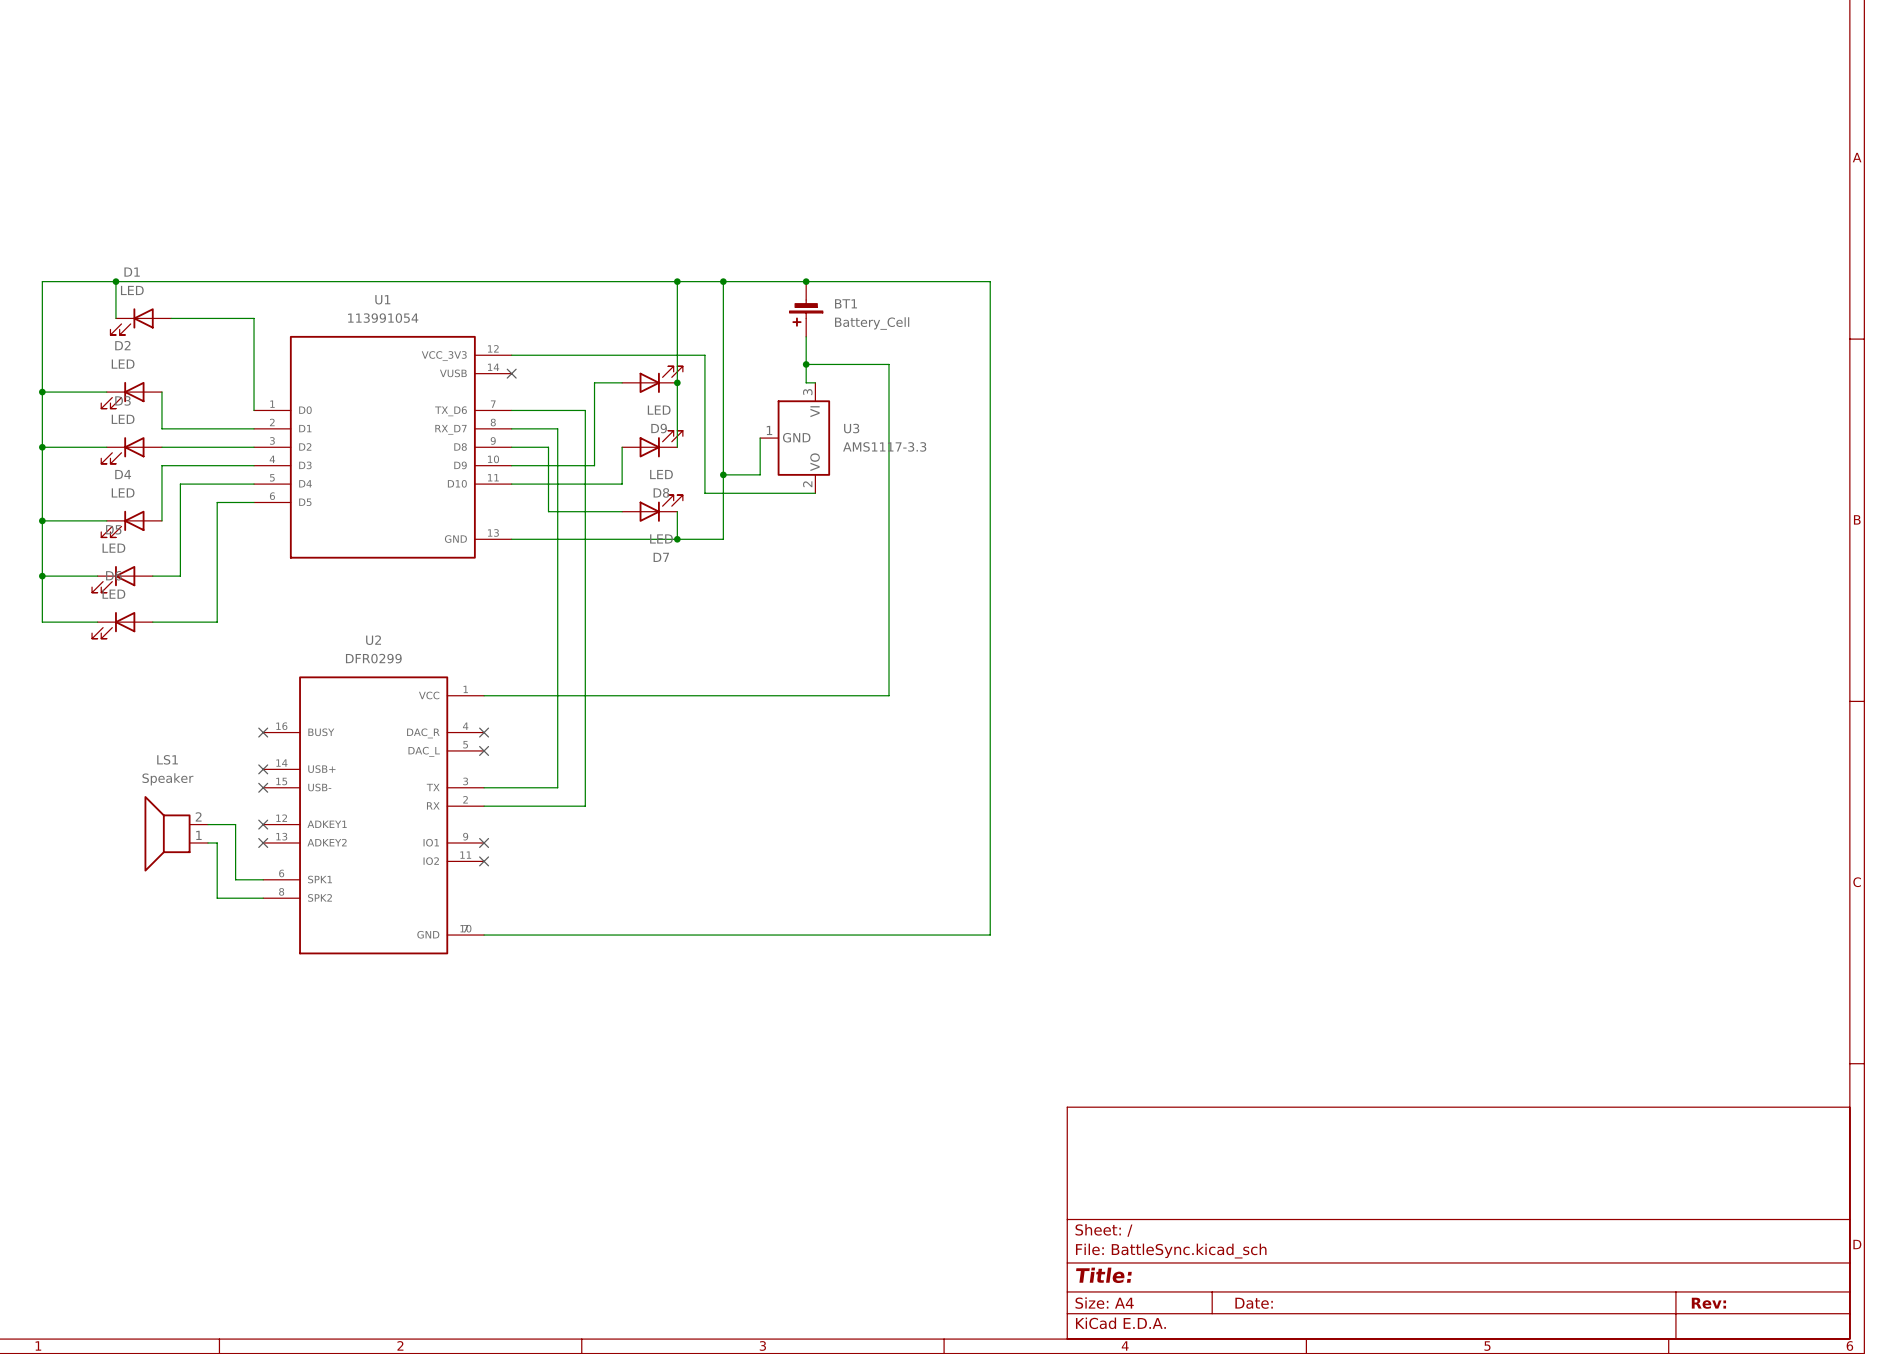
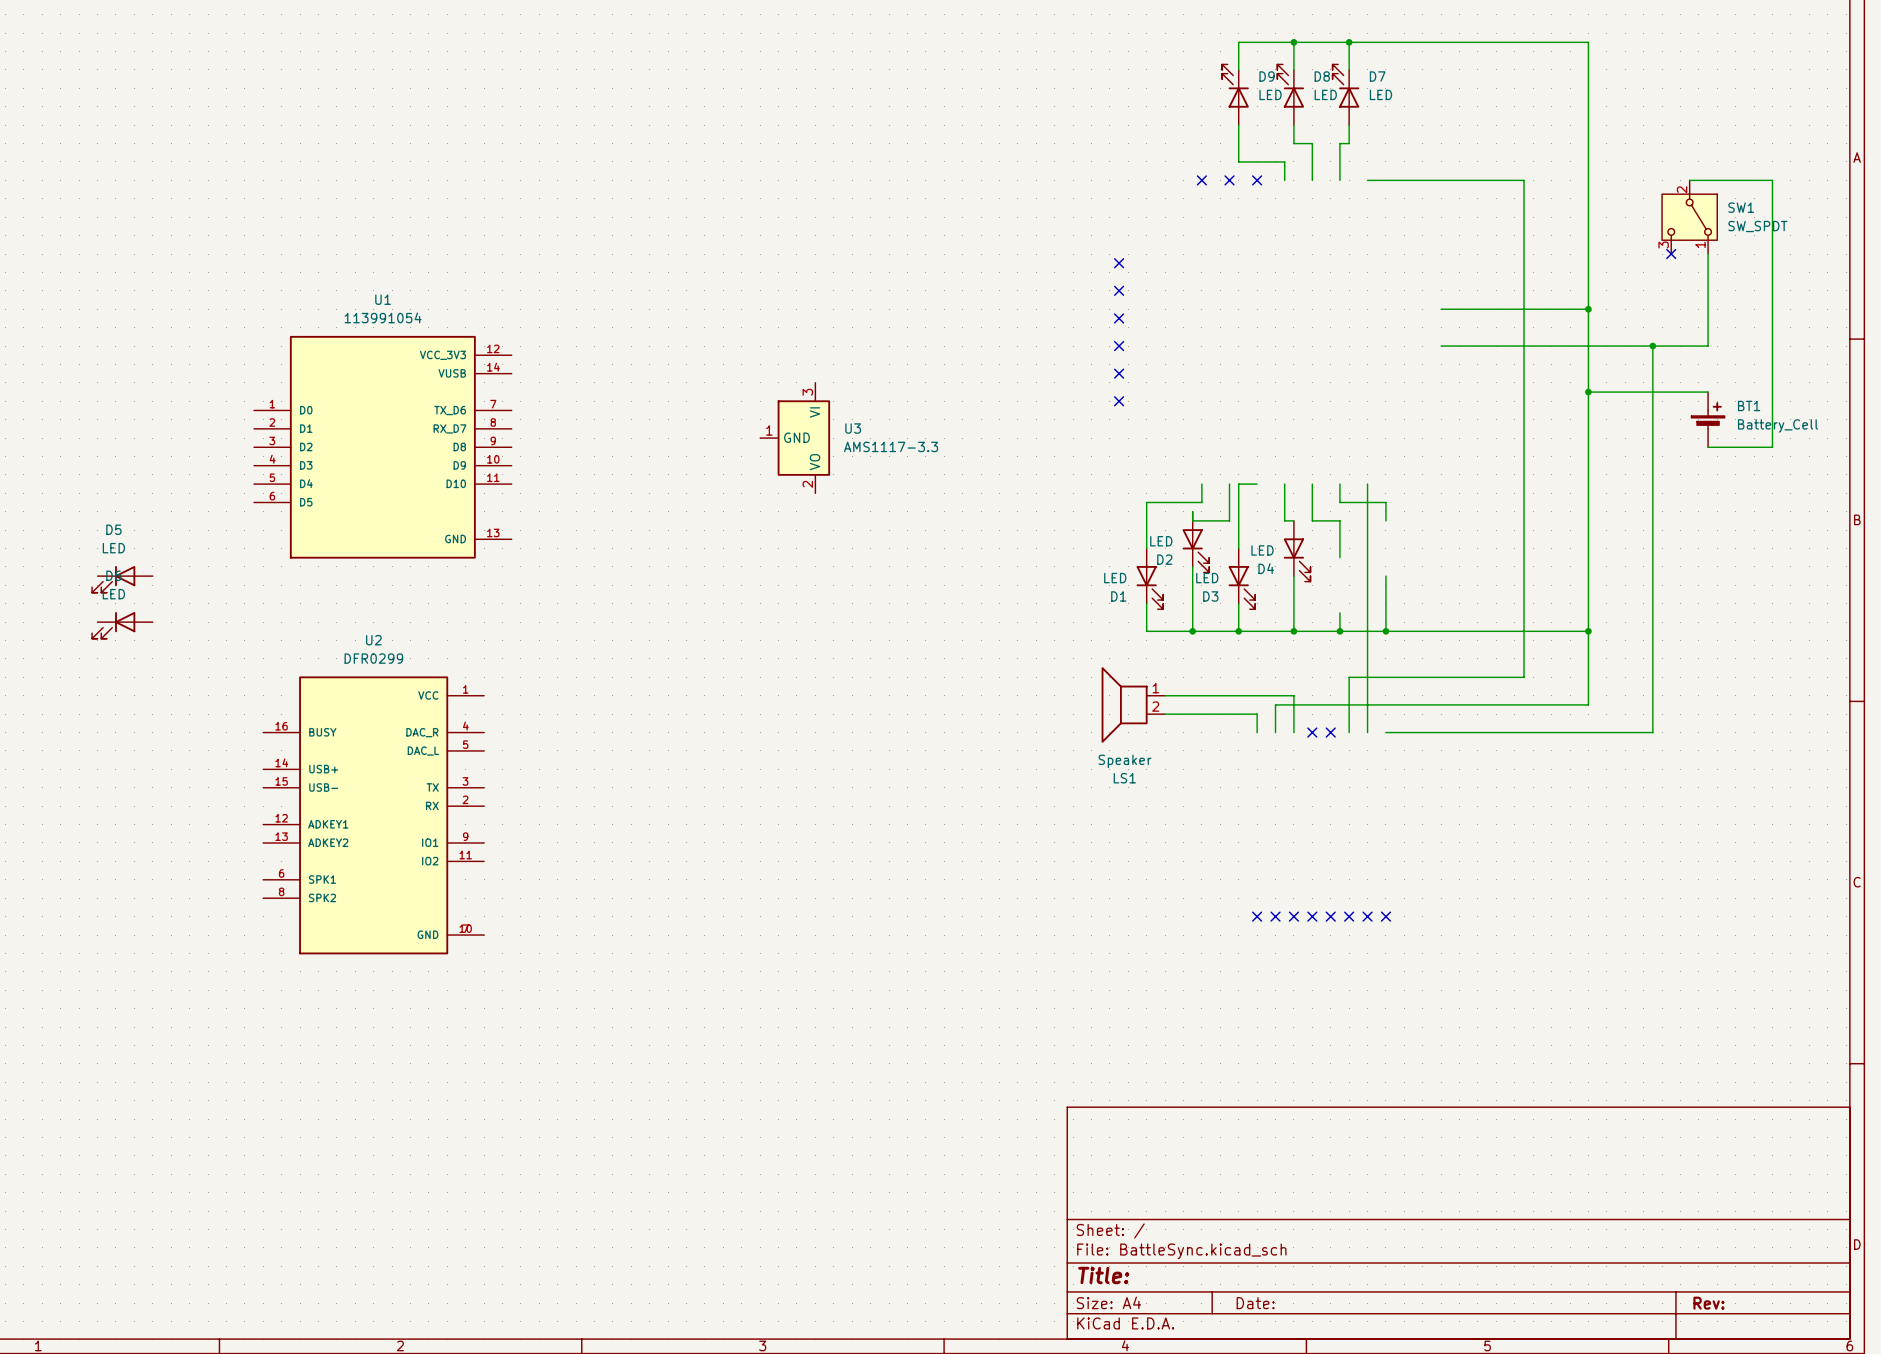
wire: none -> (1293, 42) (1293, 69)
junction: none -> (1293, 42)
wire: none -> (1349, 42) (1349, 69)
junction: none -> (1349, 42)
wire: none -> (1238, 69) (1238, 42) (1588, 42) (1588, 704) (1275, 704) (1275, 732)
wire: none -> (1238, 125) (1238, 161) (1284, 161) (1284, 180)
wire: none -> (1293, 125) (1293, 143) (1312, 143) (1312, 180)
wire: none -> (1349, 125) (1349, 143) (1339, 143) (1339, 180)
no-connect mark: none -> (1201, 180)
no-connect mark: none -> (1229, 180)
no-connect mark: none -> (1257, 180)
wire: none -> (1367, 180) (1524, 180) (1524, 677) (1349, 677) (1349, 732)
wire: none -> (1689, 180) (1772, 180) (1772, 447) (1708, 447)
SW1: none -> SW_SPDT (1689, 217)
no-connect mark: none -> (1671, 254)
wire: none -> (1708, 254) (1708, 346) (1441, 346)
no-connect mark: none -> (1119, 263)
D1 name position: D1 (132, 272) -> D1 (1118, 596)
wire: (115, 281) (115, 318) -> none
junction: (115, 281) -> none
wire: (677, 281) (677, 447) -> none
junction: (677, 281) -> none
wire: (723, 281) (723, 539) (511, 539) -> none
junction: (723, 281) -> none
junction: (806, 281) -> none
no-connect mark: none -> (1119, 290)
BT1 position: (806, 309) -> (1708, 419)
wire: none -> (1441, 309) (1588, 309)
junction: none -> (1588, 309)
BT1 rotation: 0° (806, 313) -> 180° (1708, 415)
wire: (171, 318) (254, 318) (254, 410) -> none
no-connect mark: none -> (1119, 318)
D1 rotation: 0° (132, 321) -> 90° counterclockwise (1149, 587)
D1 position: (140, 321) -> (1149, 578)
wire: (806, 336) (806, 382) (815, 382) -> none
D2 name position: D2 (122, 345) -> D2 (1164, 559)
no-connect mark: none -> (1119, 346)
wire: none -> (1652, 346) (1652, 732) (1385, 732)
junction: none -> (1652, 346)
wire: (511, 355) (704, 355) (704, 493) (815, 493) -> none
wire: (806, 364) (889, 364) (889, 695) (484, 695) -> none
junction: (806, 364) -> none
no-connect mark: (511, 373) -> none
no-connect mark: none -> (1119, 373)
D9 position: (652, 379) -> (1235, 94)
D9 rotation: 0° (661, 379) -> 90° counterclockwise (1235, 86)
wire: (622, 382) (594, 382) (594, 465) (511, 465) -> none
junction: (677, 382) -> none
wire: (42, 392) (106, 392) -> none
junction: (42, 392) -> none
wire: (161, 392) (161, 428) (254, 428) -> none
wire: none -> (1588, 392) (1708, 392)
junction: none -> (1588, 392)
D2 rotation: 0° (122, 395) -> 90° counterclockwise (1195, 550)
D2 position: (131, 395) -> (1195, 542)
D3 name position: D3 (122, 400) -> D3 (1210, 596)
no-connect mark: none -> (1119, 401)
wire: (511, 410) (585, 410) (585, 806) (484, 806) -> none
wire: (511, 428) (557, 428) (557, 787) (484, 787) -> none
D9 name position: D9 (659, 428) -> D9 (1267, 76)
wire: (760, 438) (760, 474) (723, 474) -> none
D8 position: (652, 444) -> (1290, 94)
D8 rotation: 0° (661, 444) -> 90° counterclockwise (1290, 86)
wire: (42, 447) (106, 447) -> none
junction: (42, 447) -> none
wire: (161, 447) (254, 447) -> none
wire: (511, 447) (548, 447) (548, 511) (622, 511) -> none
wire: (622, 447) (622, 484) (511, 484) -> none
D3 rotation: 0° (122, 450) -> 90° counterclockwise (1241, 587)
D3 position: (131, 450) -> (1241, 578)
wire: (254, 465) (161, 465) (161, 520) -> none
D4 name position: D4 (123, 474) -> D4 (1266, 568)
junction: (723, 474) -> none
wire: (254, 484) (180, 484) (180, 576) (152, 576) -> none
wire: none -> (1201, 484) (1201, 502) (1146, 502) (1146, 548)
wire: none -> (1229, 484) (1229, 520) (1192, 520) (1192, 511)
wire: none -> (1257, 484) (1238, 484) (1238, 548)
wire: none -> (1284, 484) (1284, 520) (1293, 520)
wire: none -> (1312, 484) (1312, 520) (1339, 520) (1339, 557)
wire: none -> (1339, 484) (1339, 502) (1385, 502) (1385, 520)
wire: none -> (1367, 484) (1367, 732)
D8 name position: D8 (661, 492) -> D8 (1322, 76)
wire: (254, 502) (217, 502) (217, 622) (152, 622) -> none
D7 position: (652, 508) -> (1345, 94)
D7 rotation: 0° (661, 508) -> 90° counterclockwise (1345, 86)
wire: (677, 511) (677, 539) -> none
wire: (42, 520) (106, 520) -> none
junction: (42, 520) -> none
D4 rotation: 0° (122, 524) -> 90° counterclockwise (1297, 560)
D4 position: (131, 524) -> (1297, 551)
junction: (677, 539) -> none
D7 name position: D7 (661, 557) -> D7 (1377, 76)
wire: none -> (1192, 566) (1192, 631)
wire: (42, 576) (97, 576) -> none
junction: (42, 576) -> none
wire: none -> (1293, 576) (1293, 631)
wire: none -> (1385, 576) (1385, 631)
wire: none -> (1146, 603) (1146, 631) (1588, 631)
wire: none -> (1238, 603) (1238, 631)
wire: none -> (1339, 612) (1339, 631)
wire: (97, 622) (42, 622) (42, 281) (990, 281) (990, 935) (484, 935) -> none
junction: none -> (1192, 631)
junction: none -> (1238, 631)
junction: none -> (1293, 631)
junction: none -> (1339, 631)
junction: none -> (1385, 631)
junction: none -> (1588, 631)
wire: none -> (1165, 695) (1293, 695) (1293, 732)
wire: none -> (1165, 714) (1257, 714) (1257, 732)
no-connect mark: (263, 732) -> none
no-connect mark: (484, 732) -> none
no-connect mark: none -> (1312, 732)
no-connect mark: none -> (1330, 732)
no-connect mark: (484, 750) -> none
no-connect mark: (263, 769) -> none
no-connect mark: (263, 787) -> none
wire: (208, 824) (235, 824) (235, 879) (263, 879) -> none
no-connect mark: (263, 824) -> none
LS1 flip: as is (167, 833) -> up-down (1124, 704)
LS1 position: (176, 833) -> (1133, 704)
wire: (208, 842) (217, 842) (217, 898) (263, 898) -> none
no-connect mark: (263, 842) -> none
no-connect mark: (484, 842) -> none
no-connect mark: (484, 861) -> none
no-connect mark: none -> (1257, 916)
no-connect mark: none -> (1275, 916)
no-connect mark: none -> (1293, 916)
no-connect mark: none -> (1312, 916)
no-connect mark: none -> (1330, 916)
no-connect mark: none -> (1349, 916)
no-connect mark: none -> (1367, 916)
no-connect mark: none -> (1385, 916)

